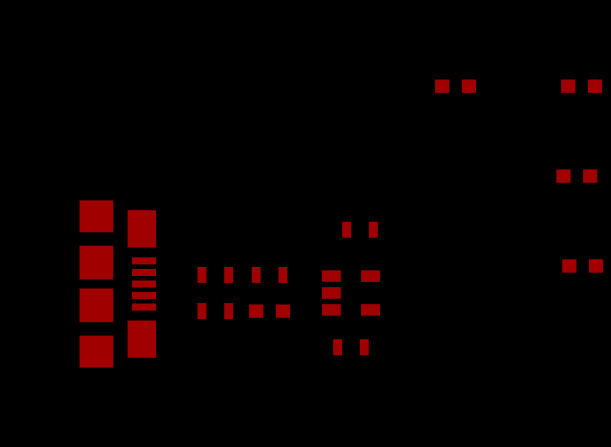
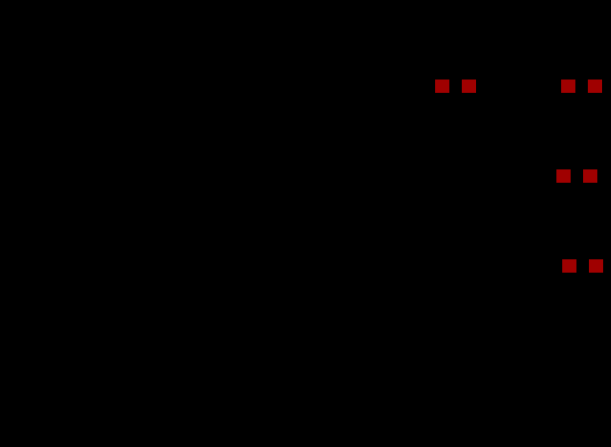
part: (360, 229) -> none
part: (215, 274) -> none
part: (269, 274) -> none
part: (117, 283) -> none
part: (350, 293) -> none
part: (215, 311) -> none
part: (269, 311) -> none
part: (350, 347) -> none

